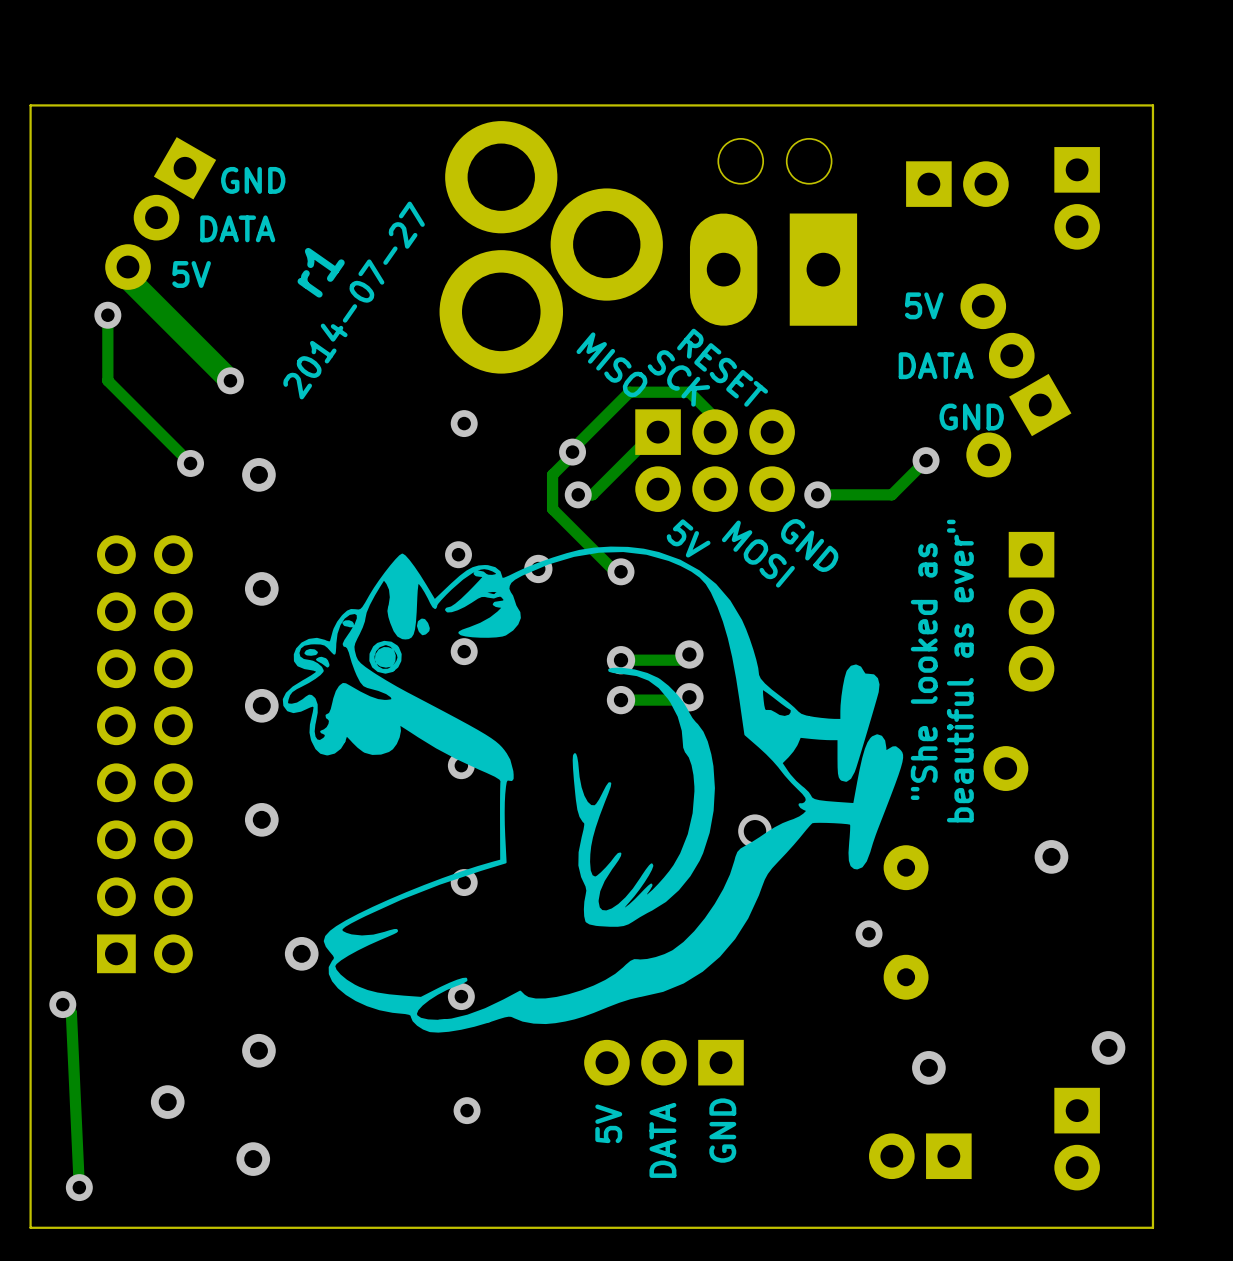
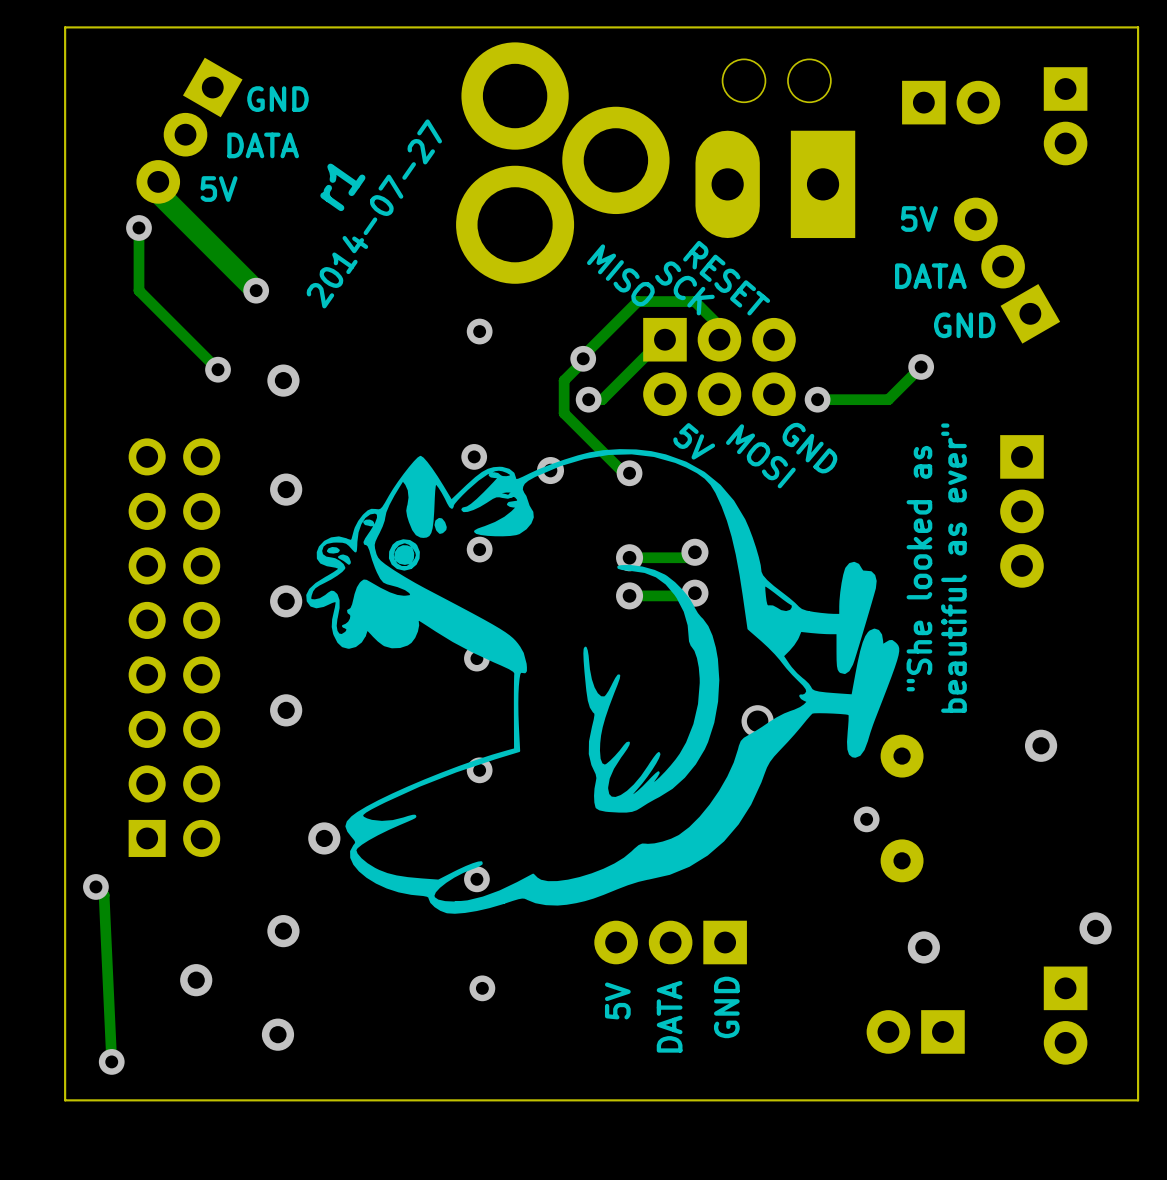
part: (988, 454) -> none
part: (1005, 768) -> none

